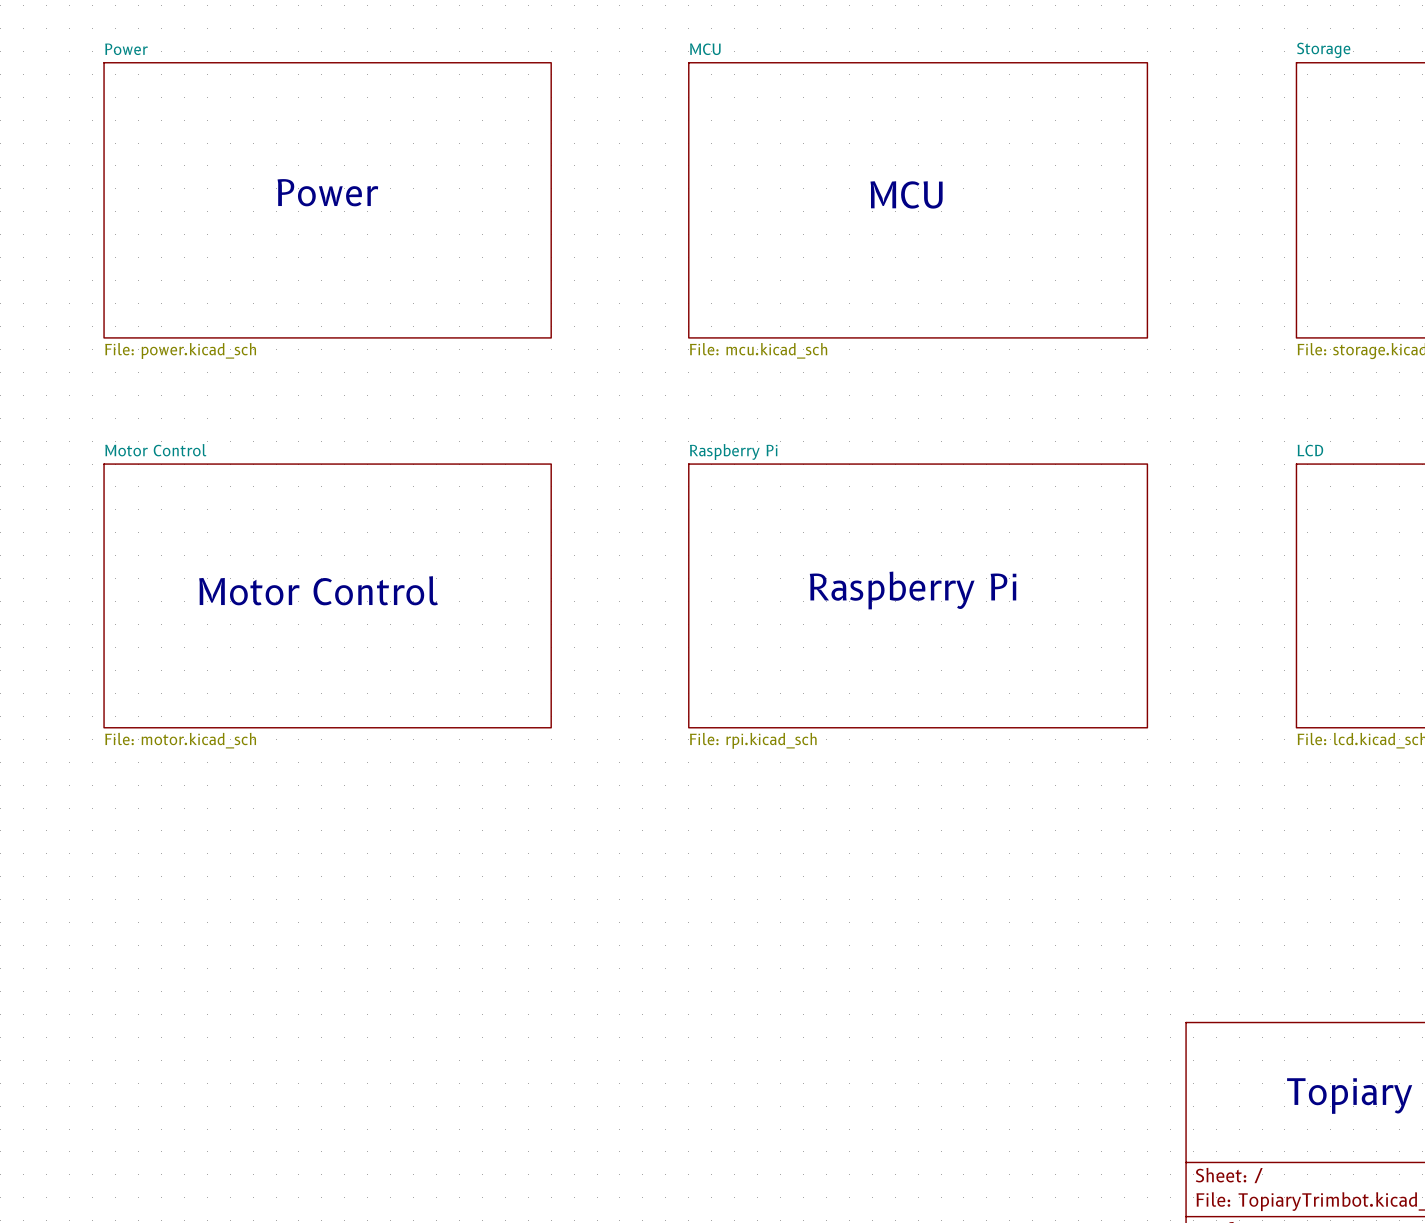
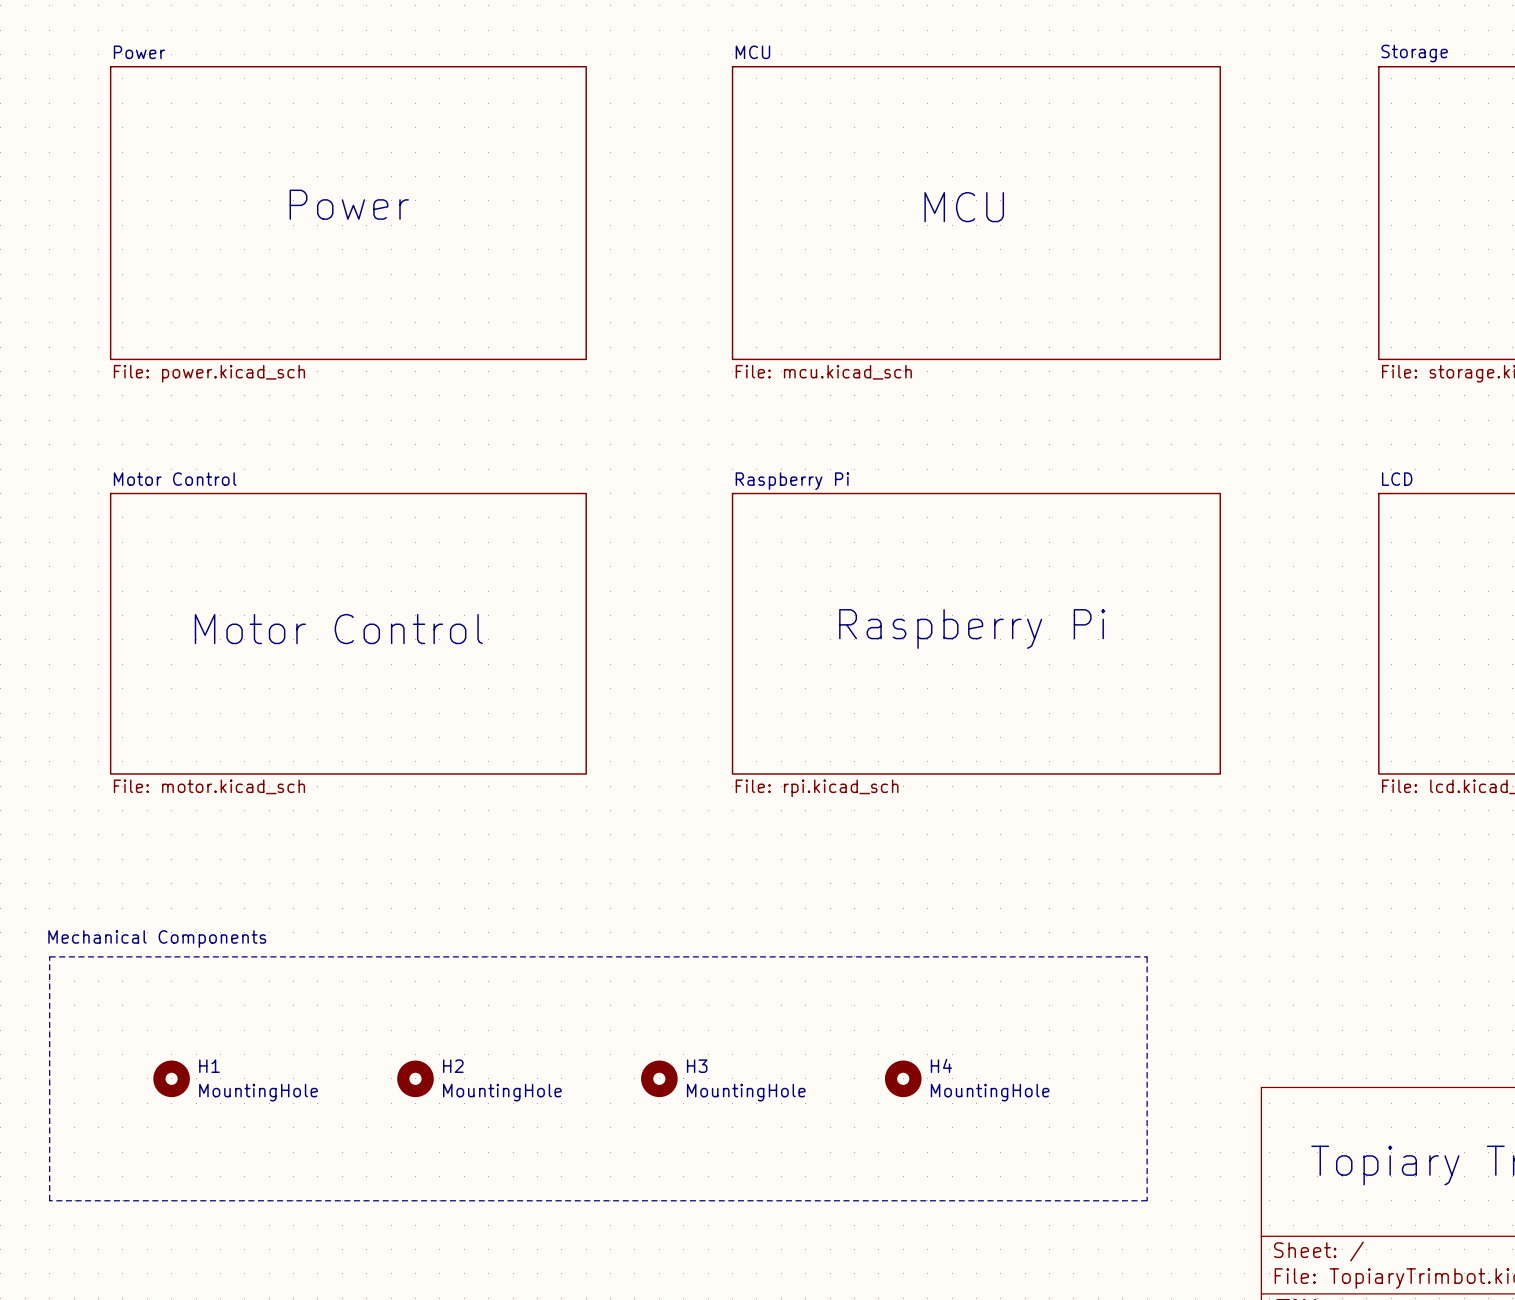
text: none -> Mechanical Components (157, 939)
line: none -> (49, 956) (1147, 956) (1147, 1200) (49, 1200) (49, 956)
H1: none -> MountingHole (171, 1078)
H2: none -> MountingHole (415, 1078)
H3: none -> MountingHole (659, 1078)
H4: none -> MountingHole (903, 1078)

